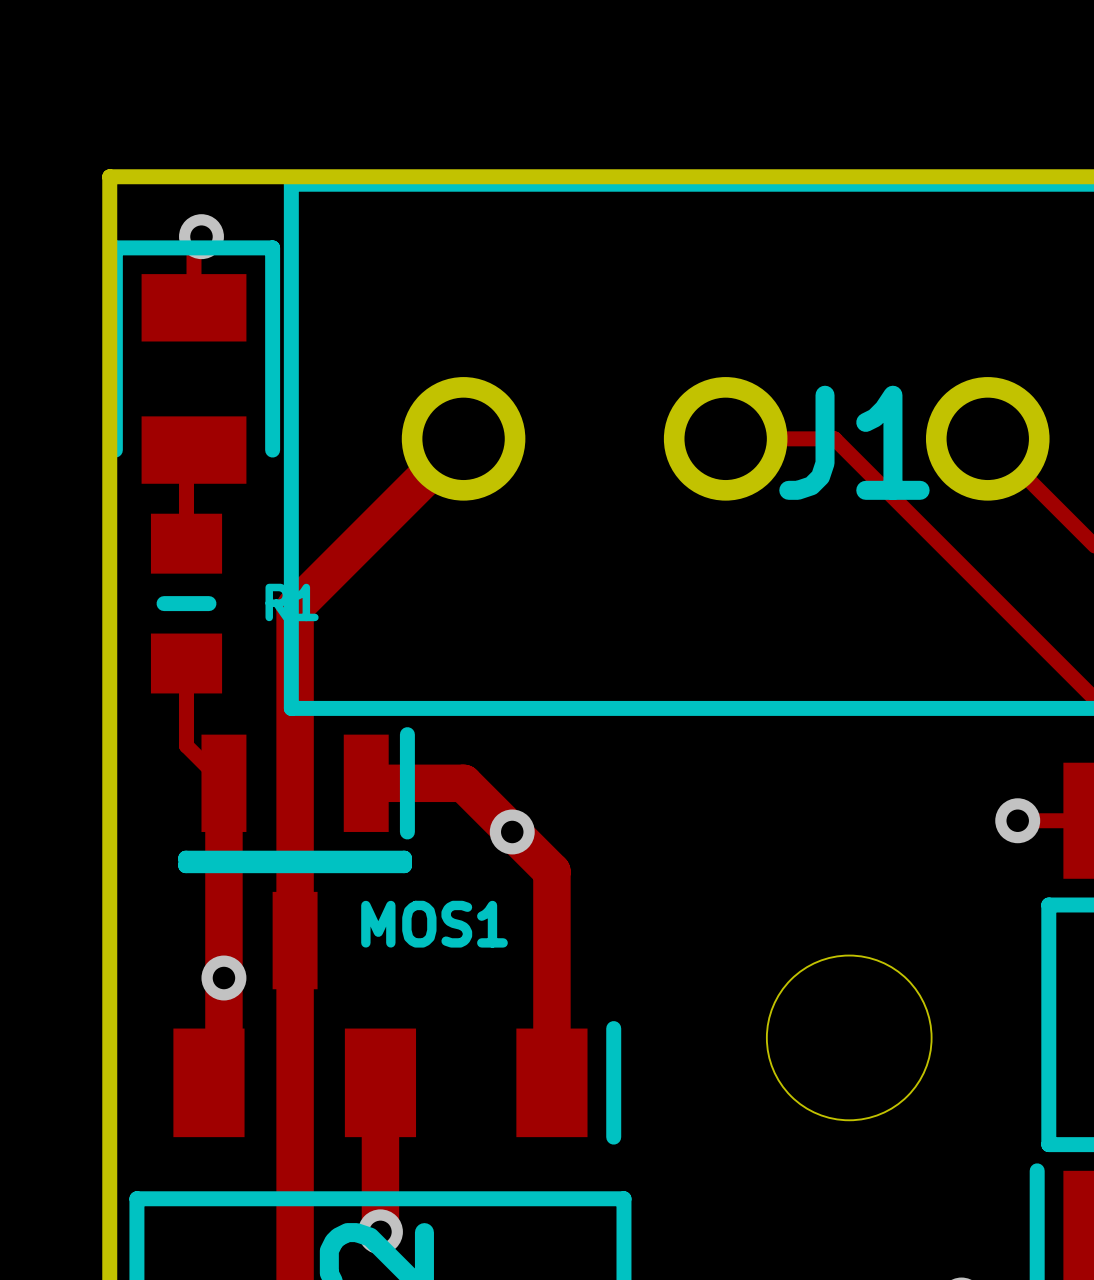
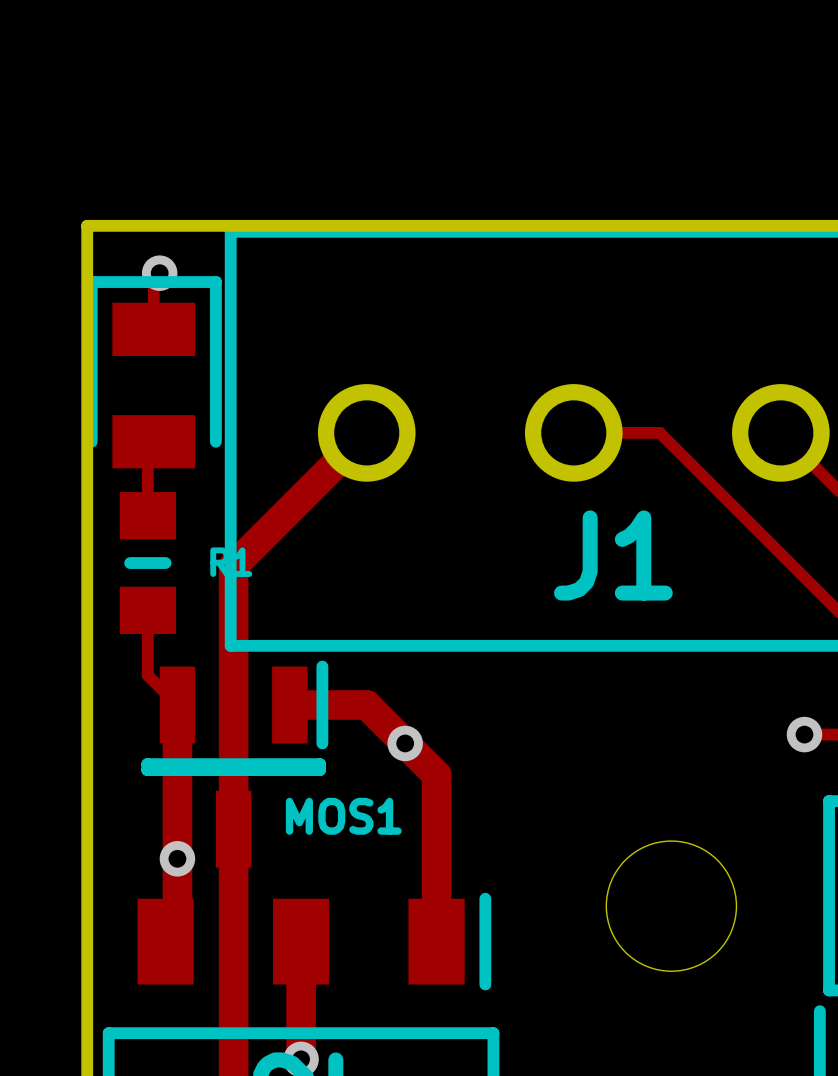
J1 name position: J1 (854, 442) -> J1 (613, 555)

